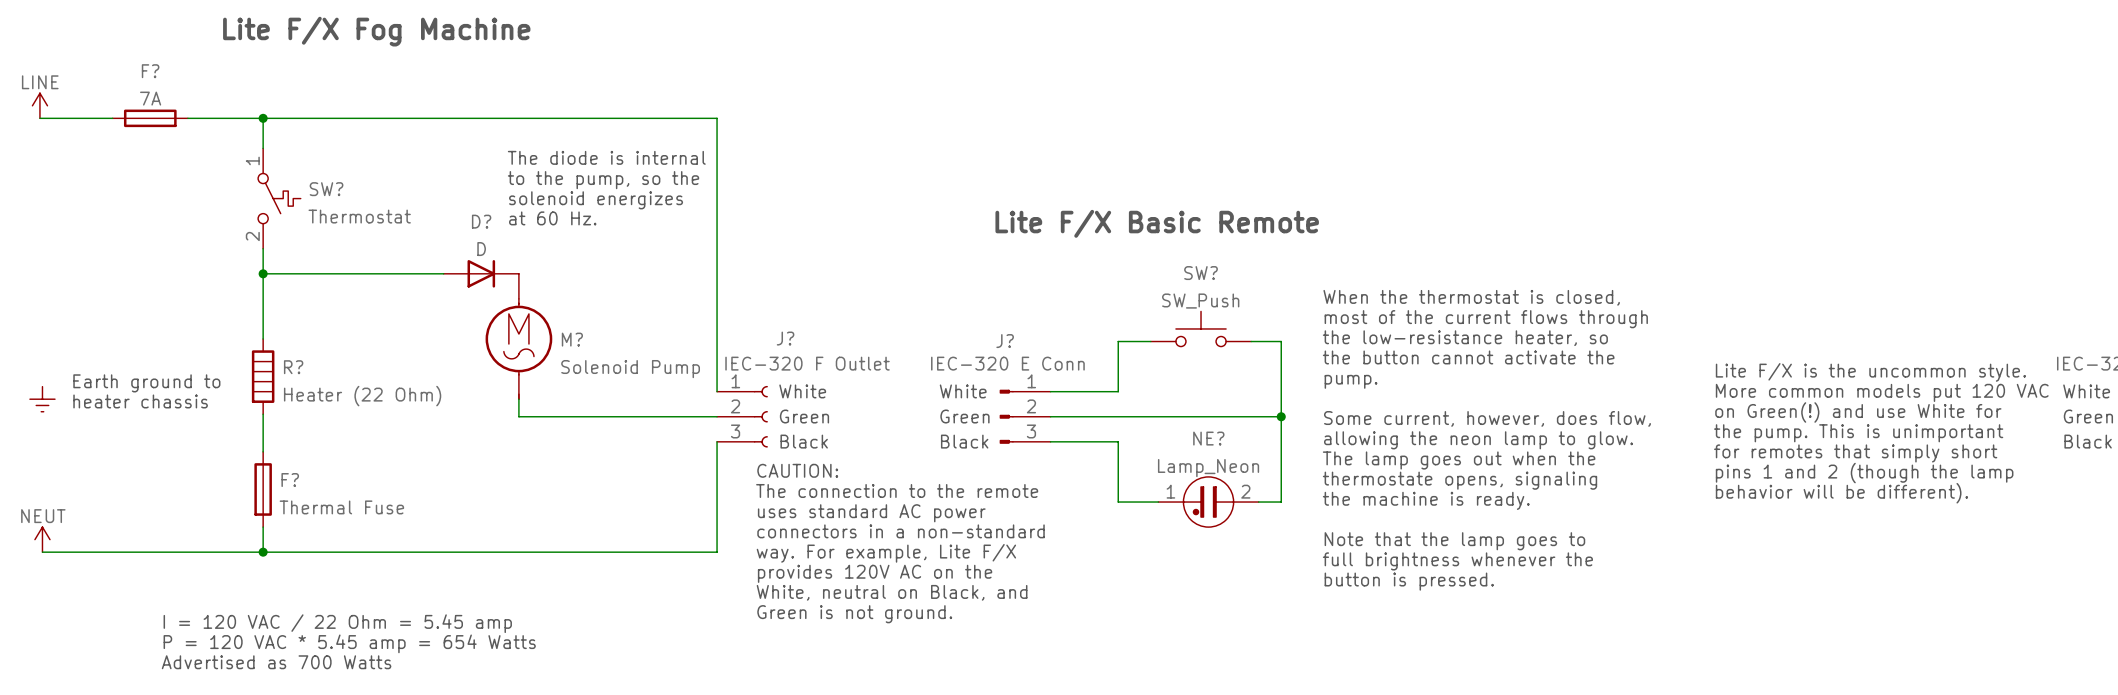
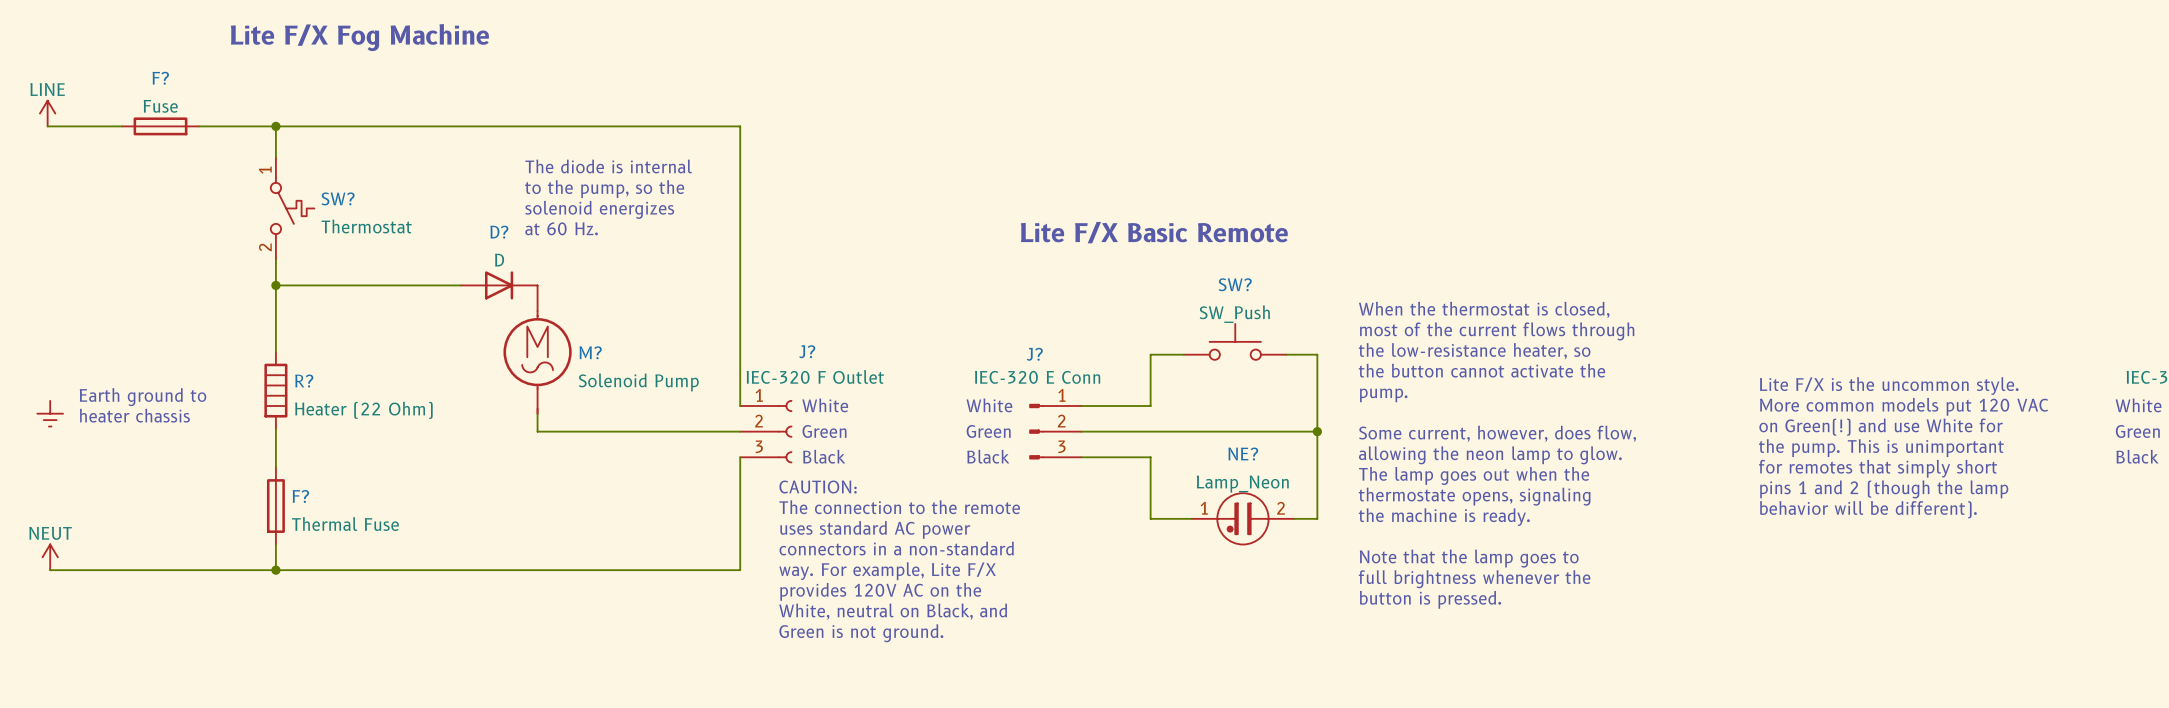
F? value: 7A (150, 98) -> Fuse (160, 106)
text: I = 120 VAC / 22 Ohm = 5.45 amp (337, 623) -> none
text: P = 120 VAC * 5.45 amp = 654 Watts (349, 643) -> none
text: Advertised as 700 Watts (276, 662) -> none

